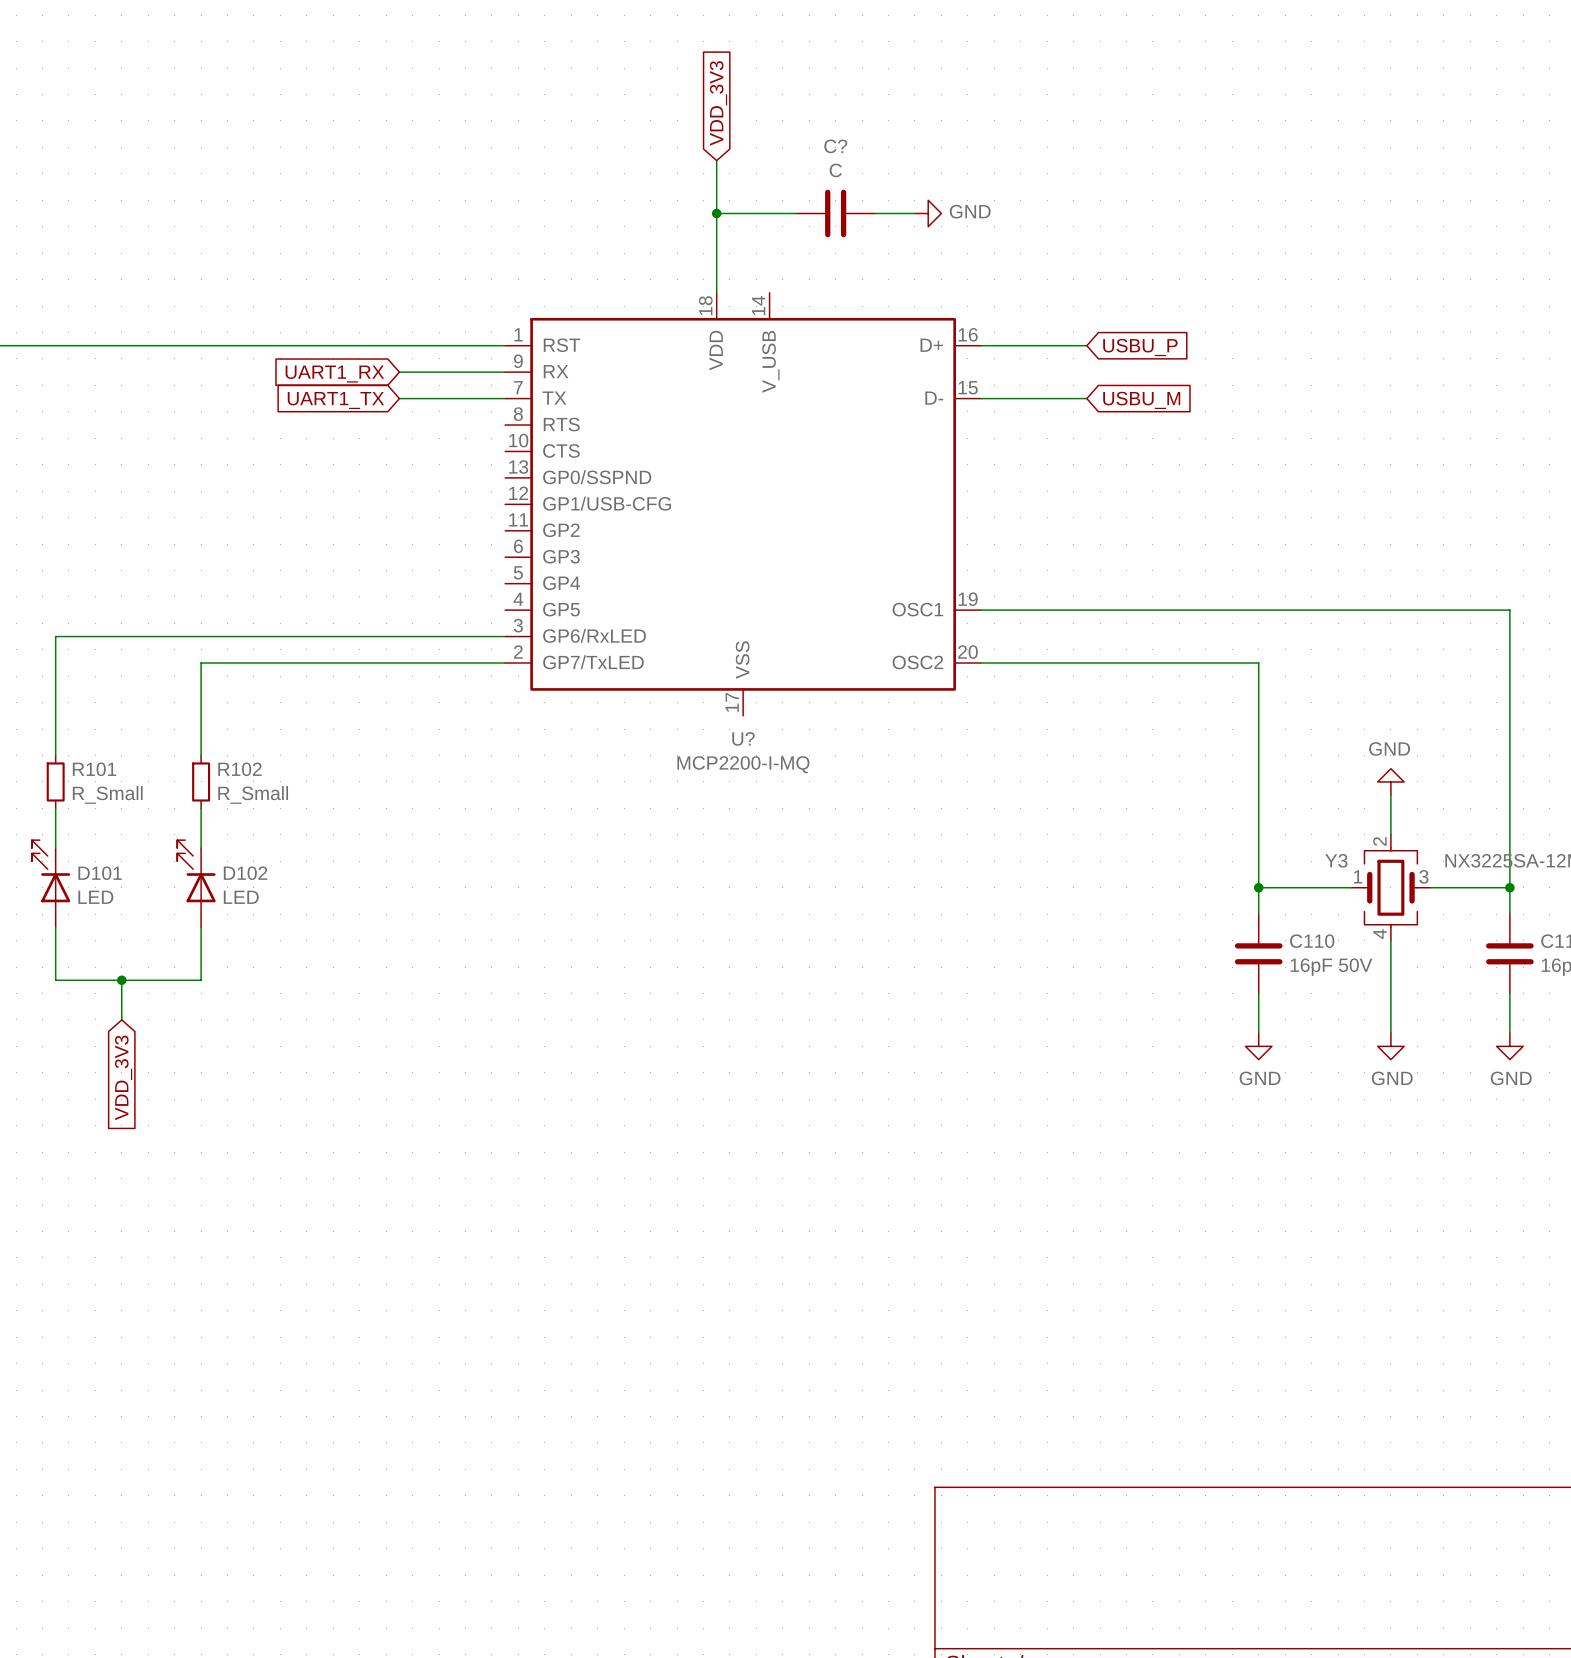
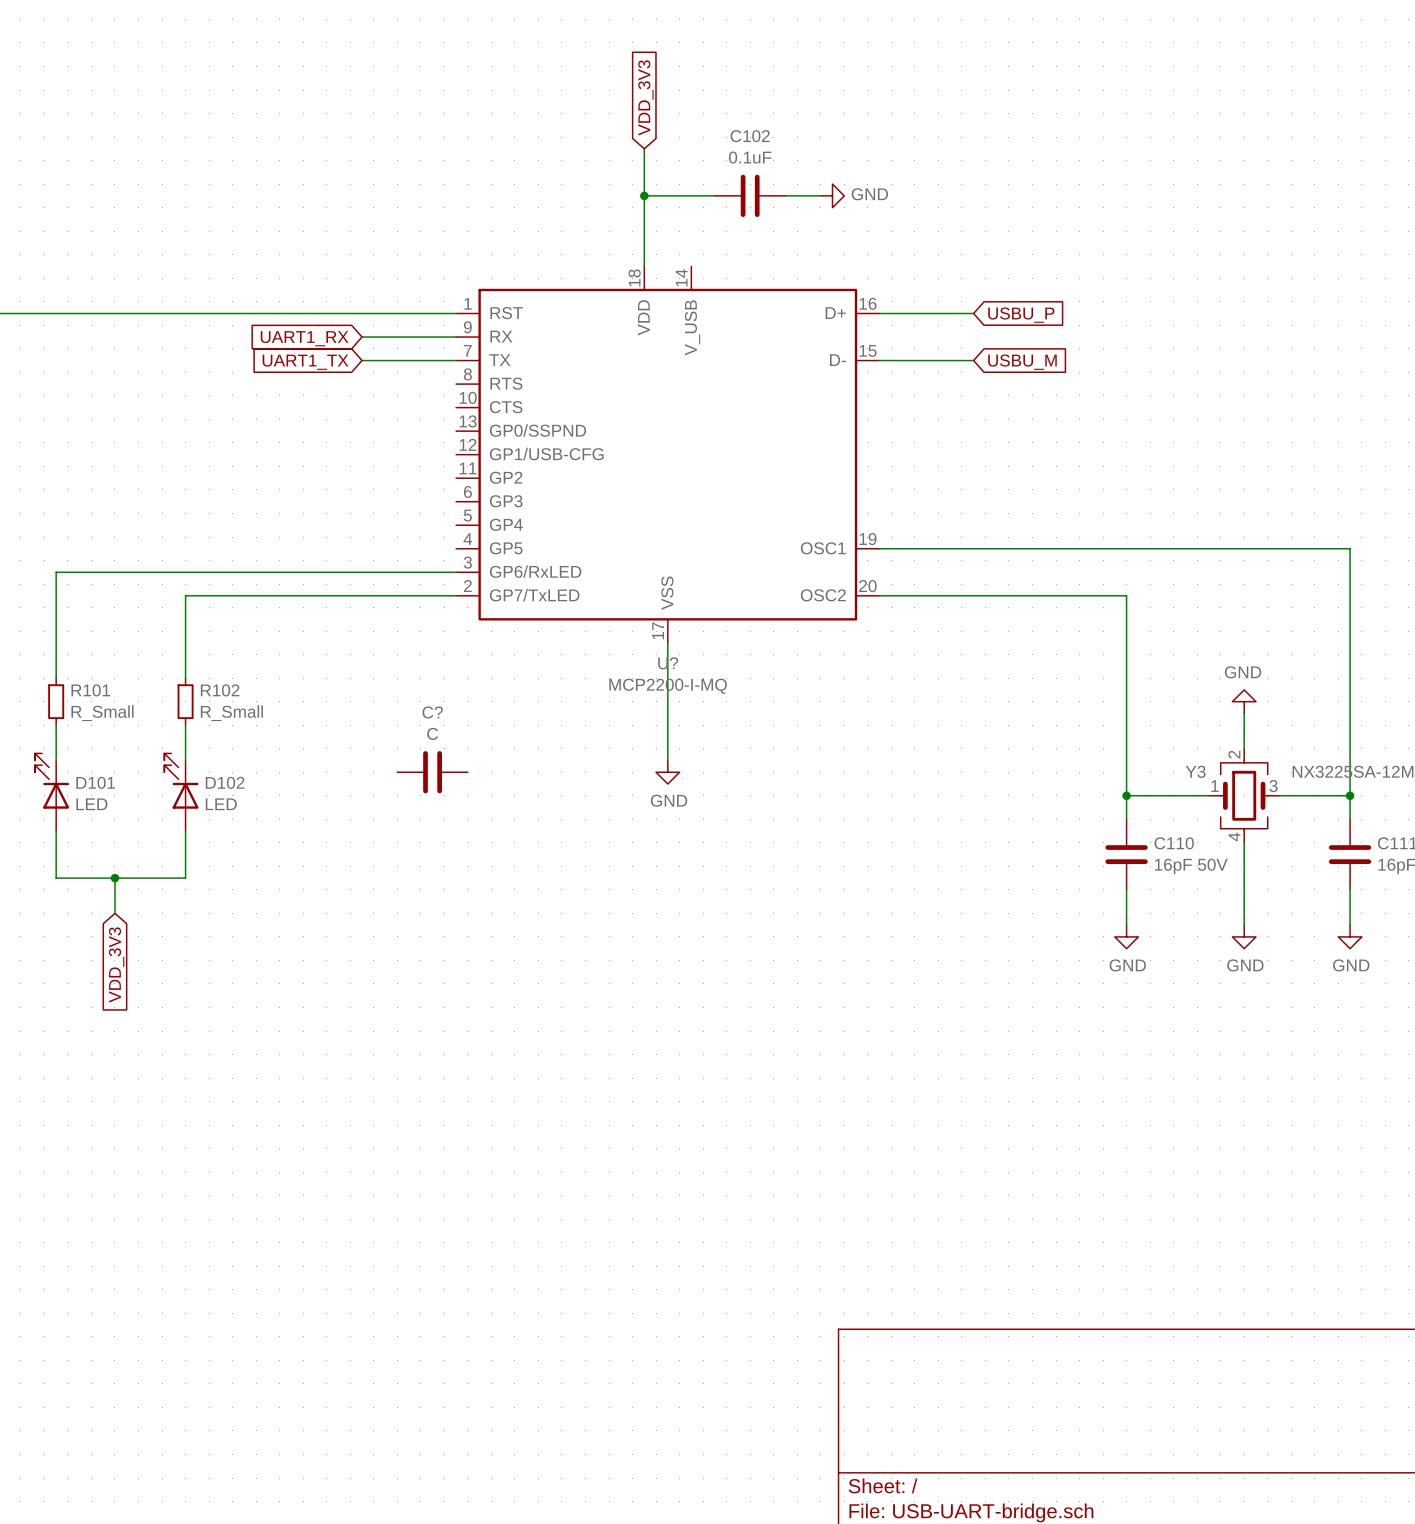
C? name: C? (835, 146) -> C102 (750, 136)
C? value: C (835, 170) -> 0.1uF (750, 157)
wire: none -> (667, 642) (667, 760)
C?: none -> C (432, 772)
power symbol: none -> GND (667, 772)

